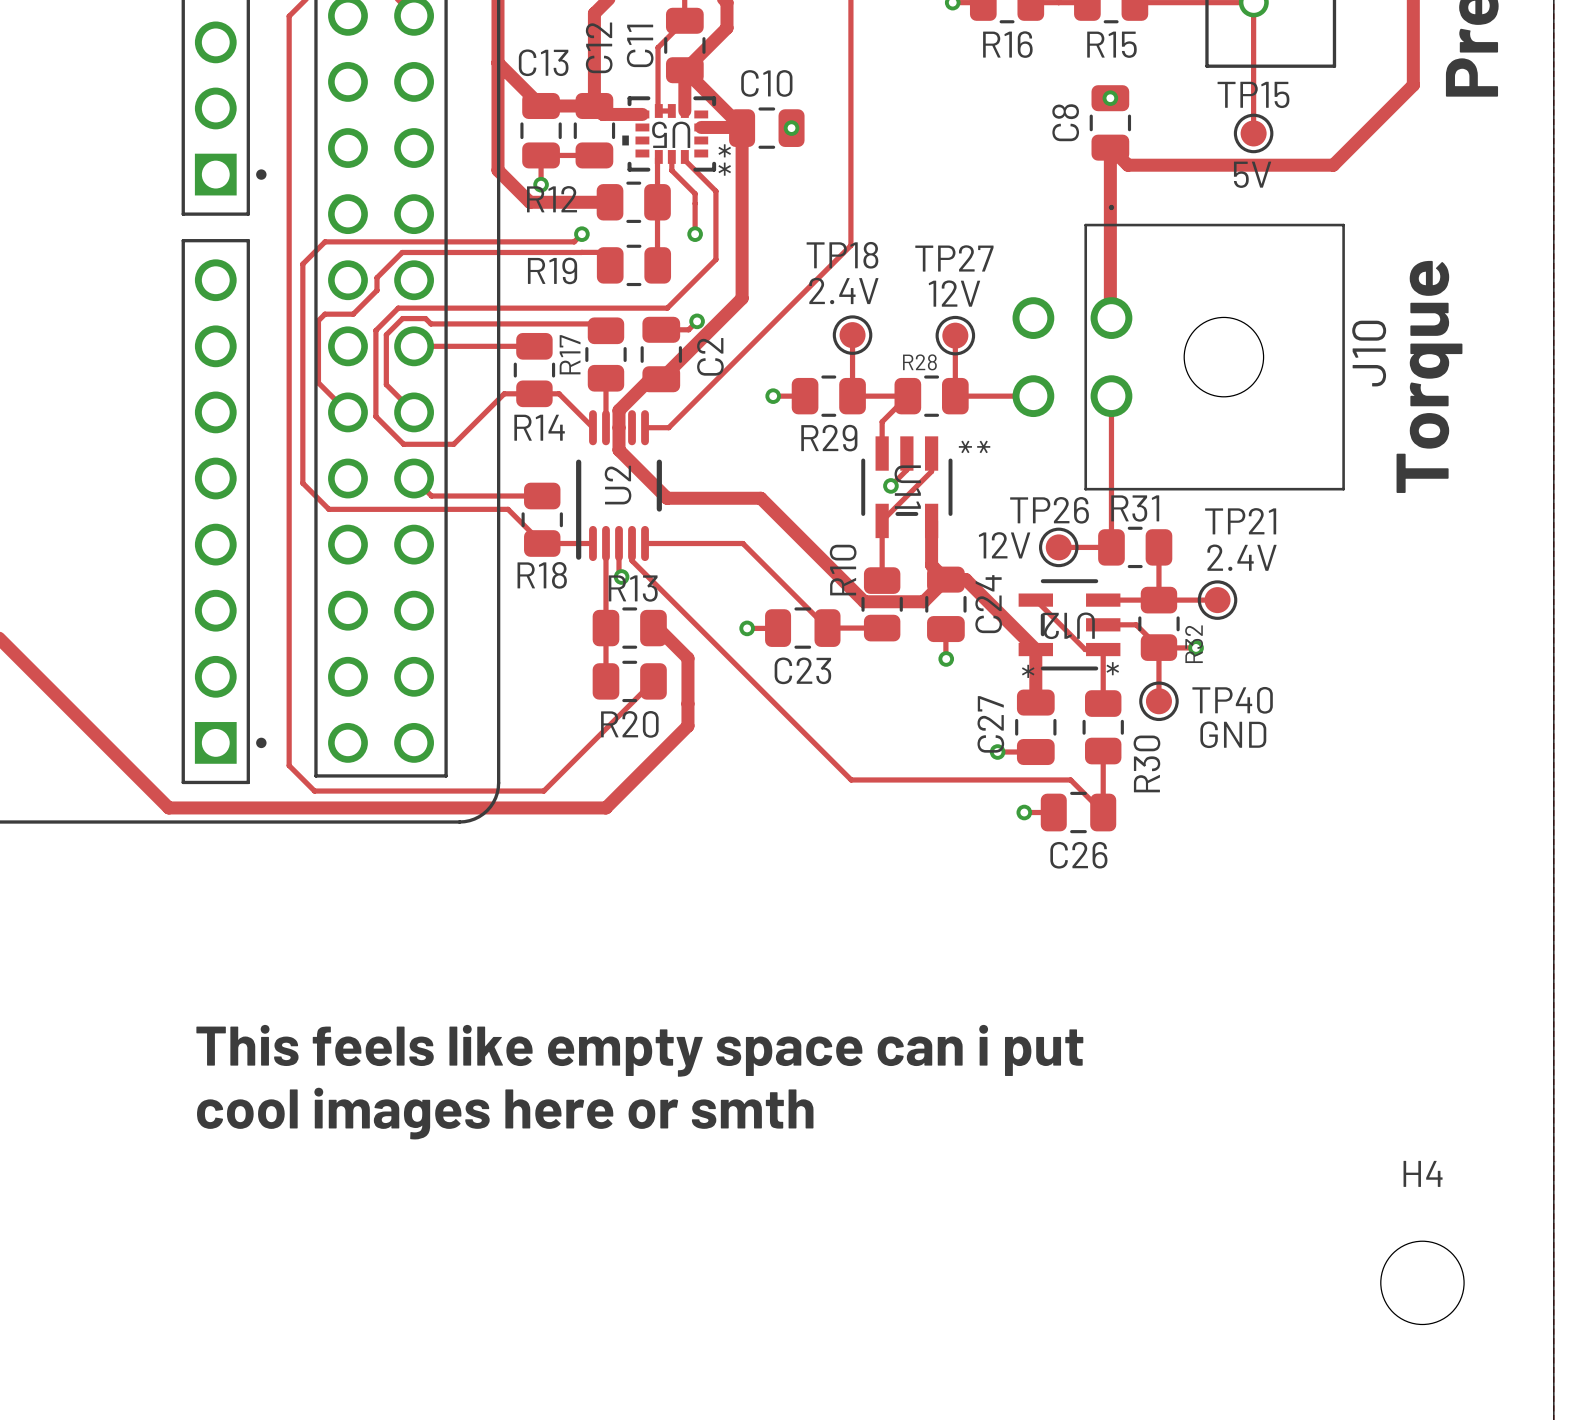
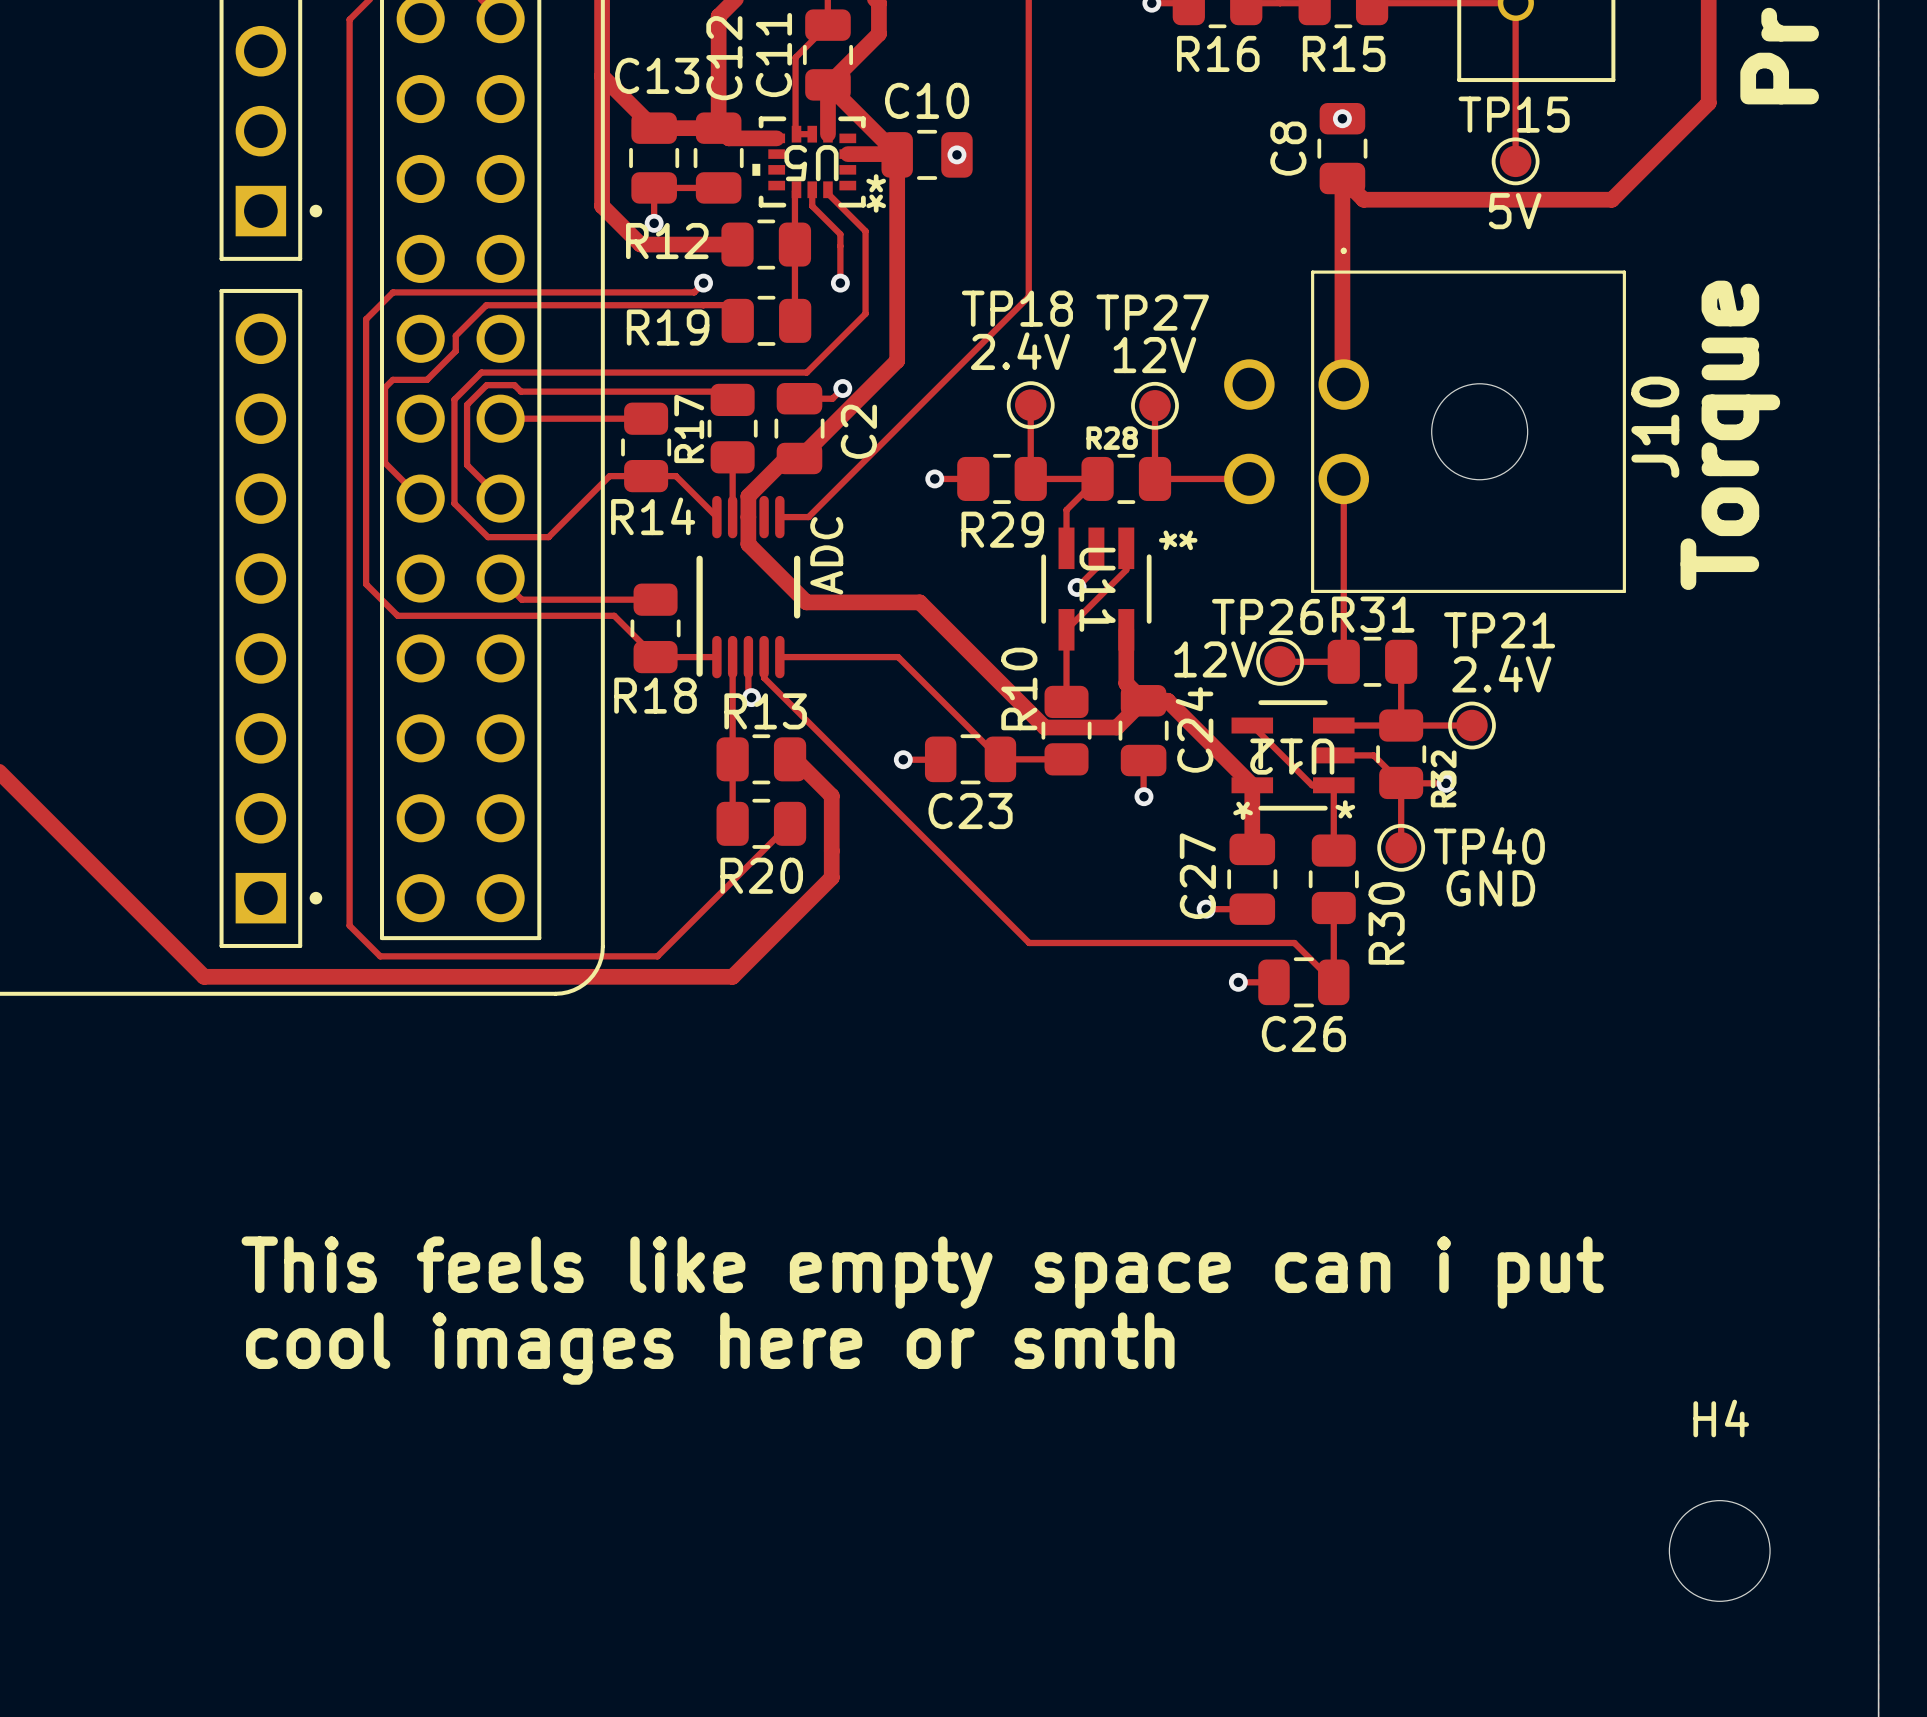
U2 name: U2 (618, 485) -> ADC (826, 555)

